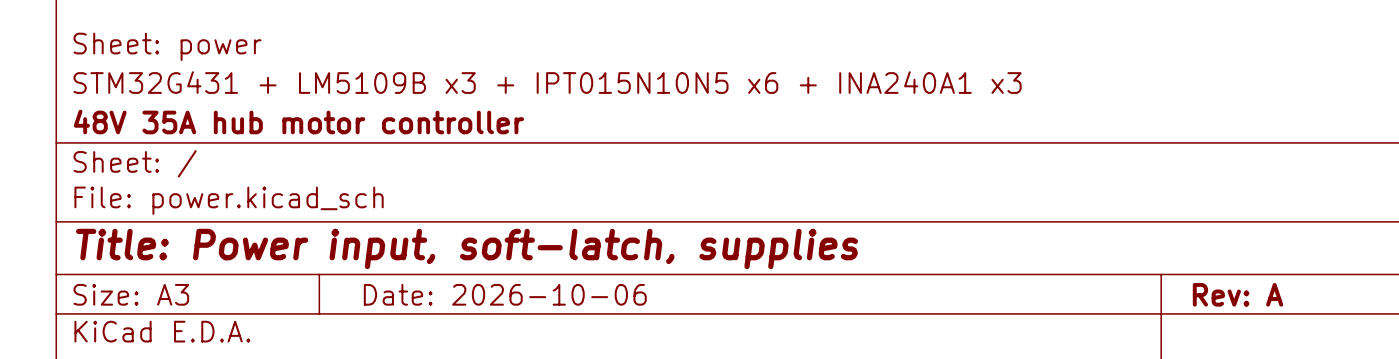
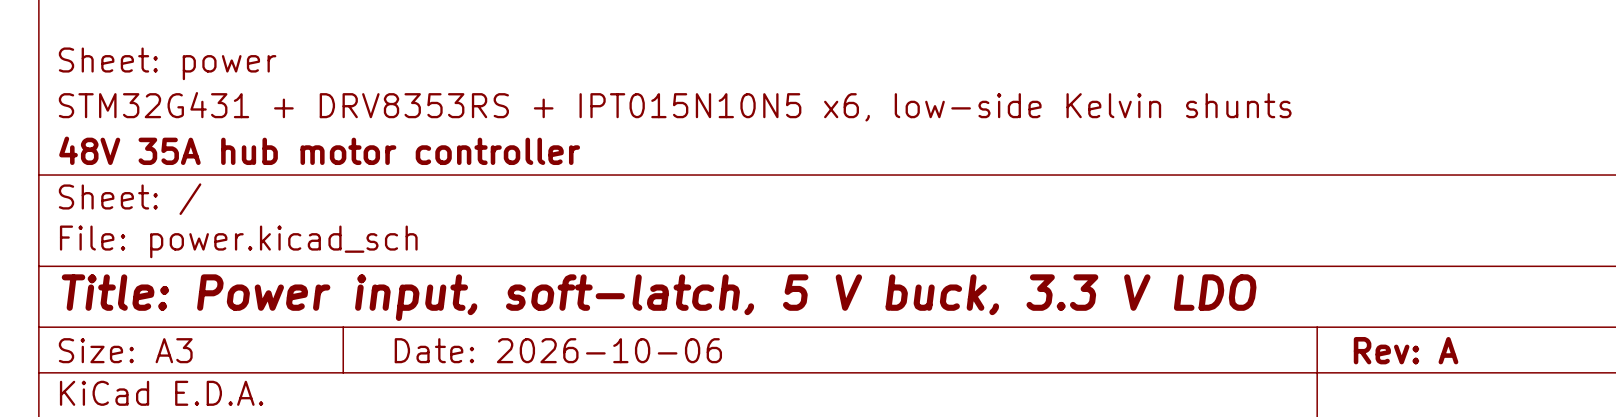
title block: STM32G431 + LM5109B x3 + IPT015N10N5 x6 + INA240A1 x3 (547, 82) -> STM32G431 + DRV8353RS + IPT015N10N5 x6, low-side Kelvin shunts (675, 106)
title block: Title: Power input, soft-latch, supplies (467, 248) -> Title: Power input, soft-latch, 5 V buck, 3.3 V LDO (659, 297)

